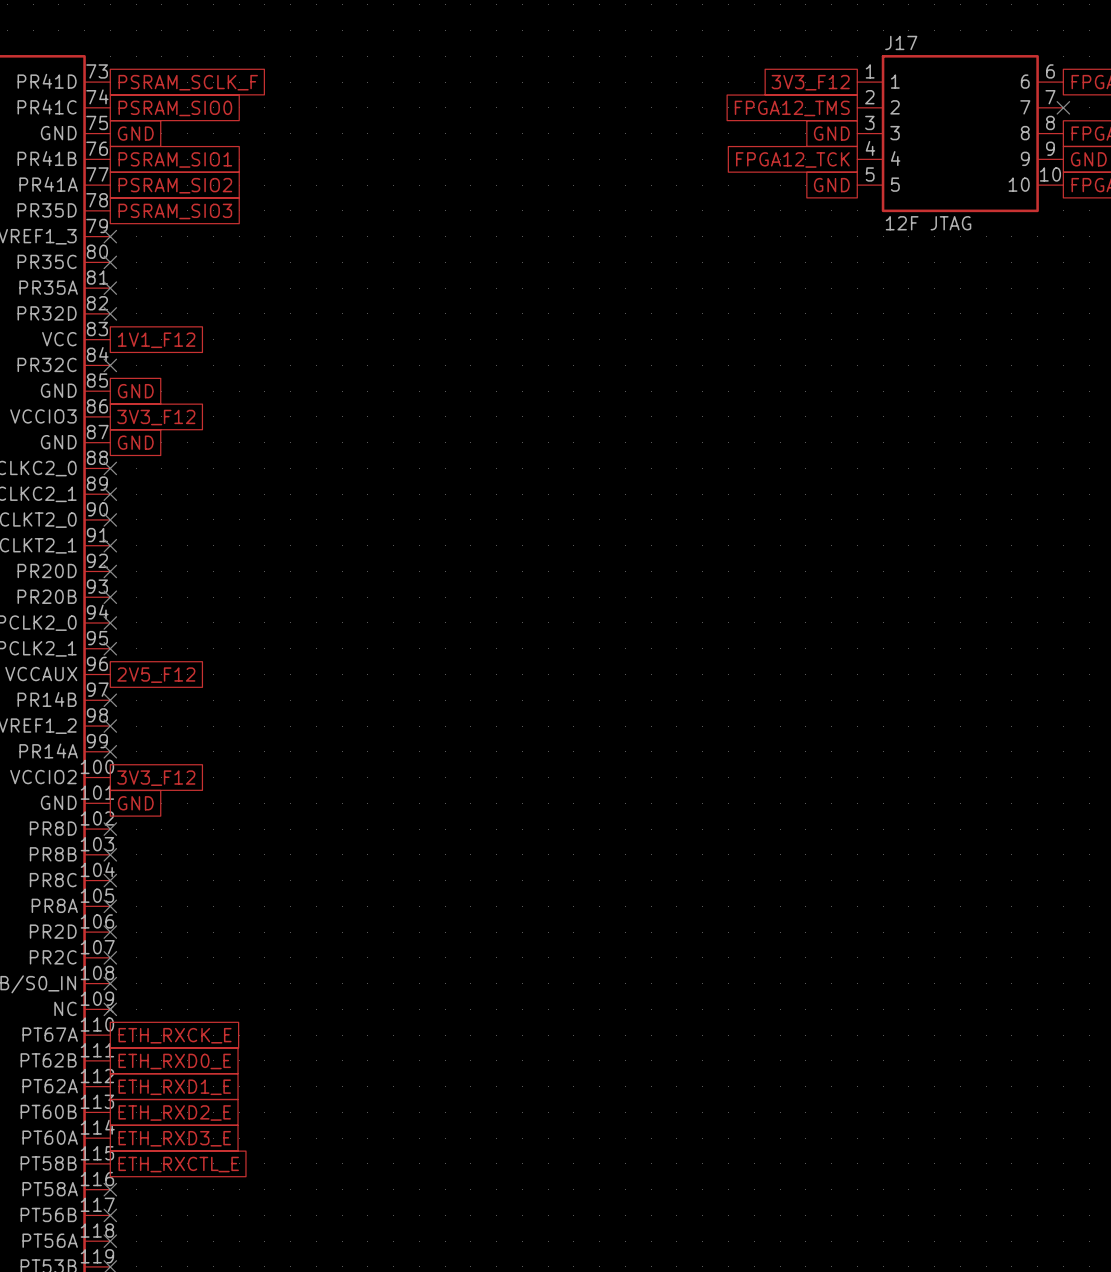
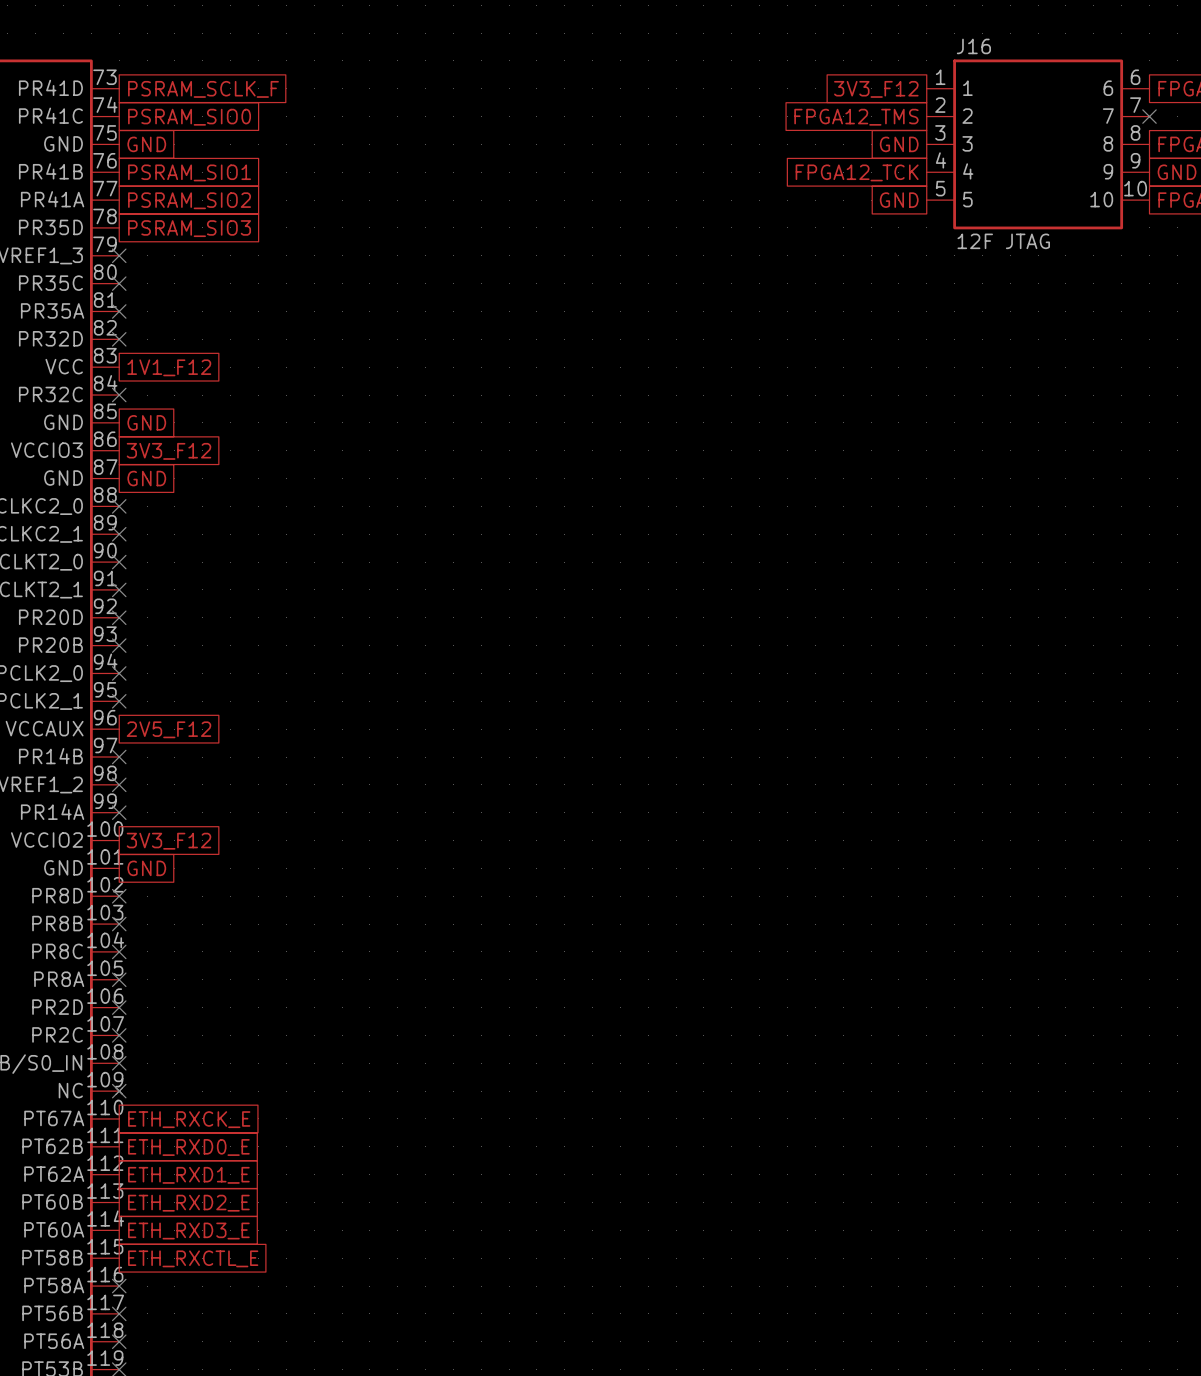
J17 name: J17 (901, 42) -> J16 (973, 46)

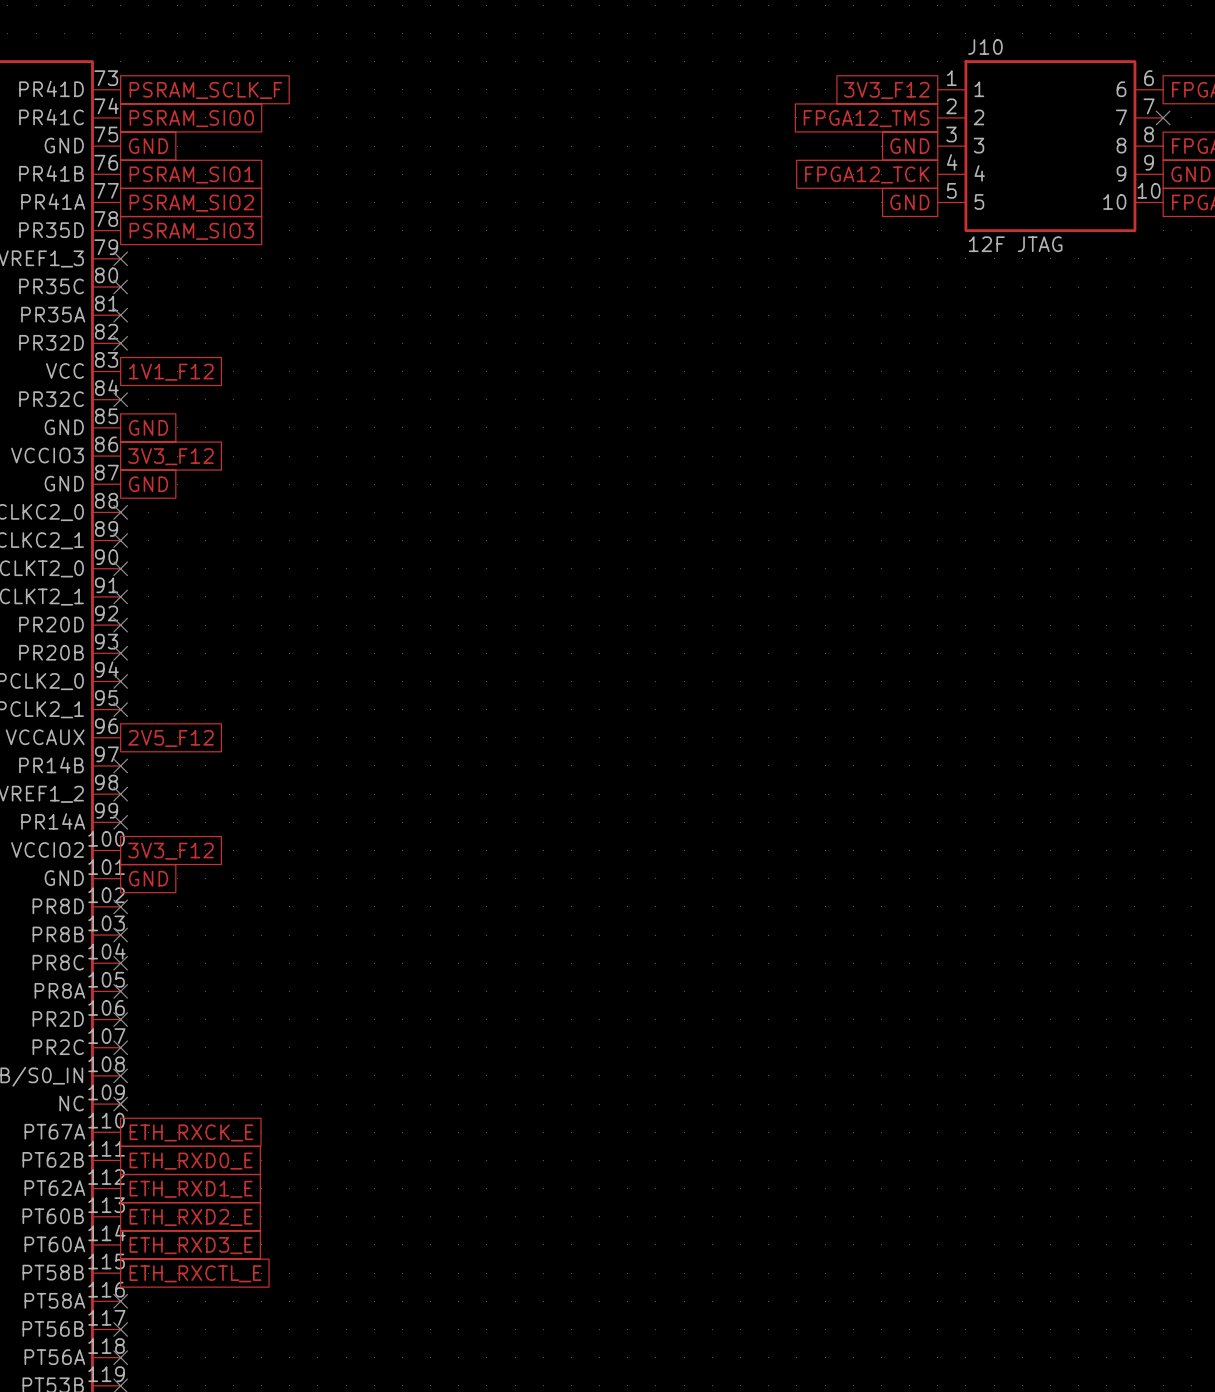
J16 name: J16 (973, 46) -> J10 (985, 46)

